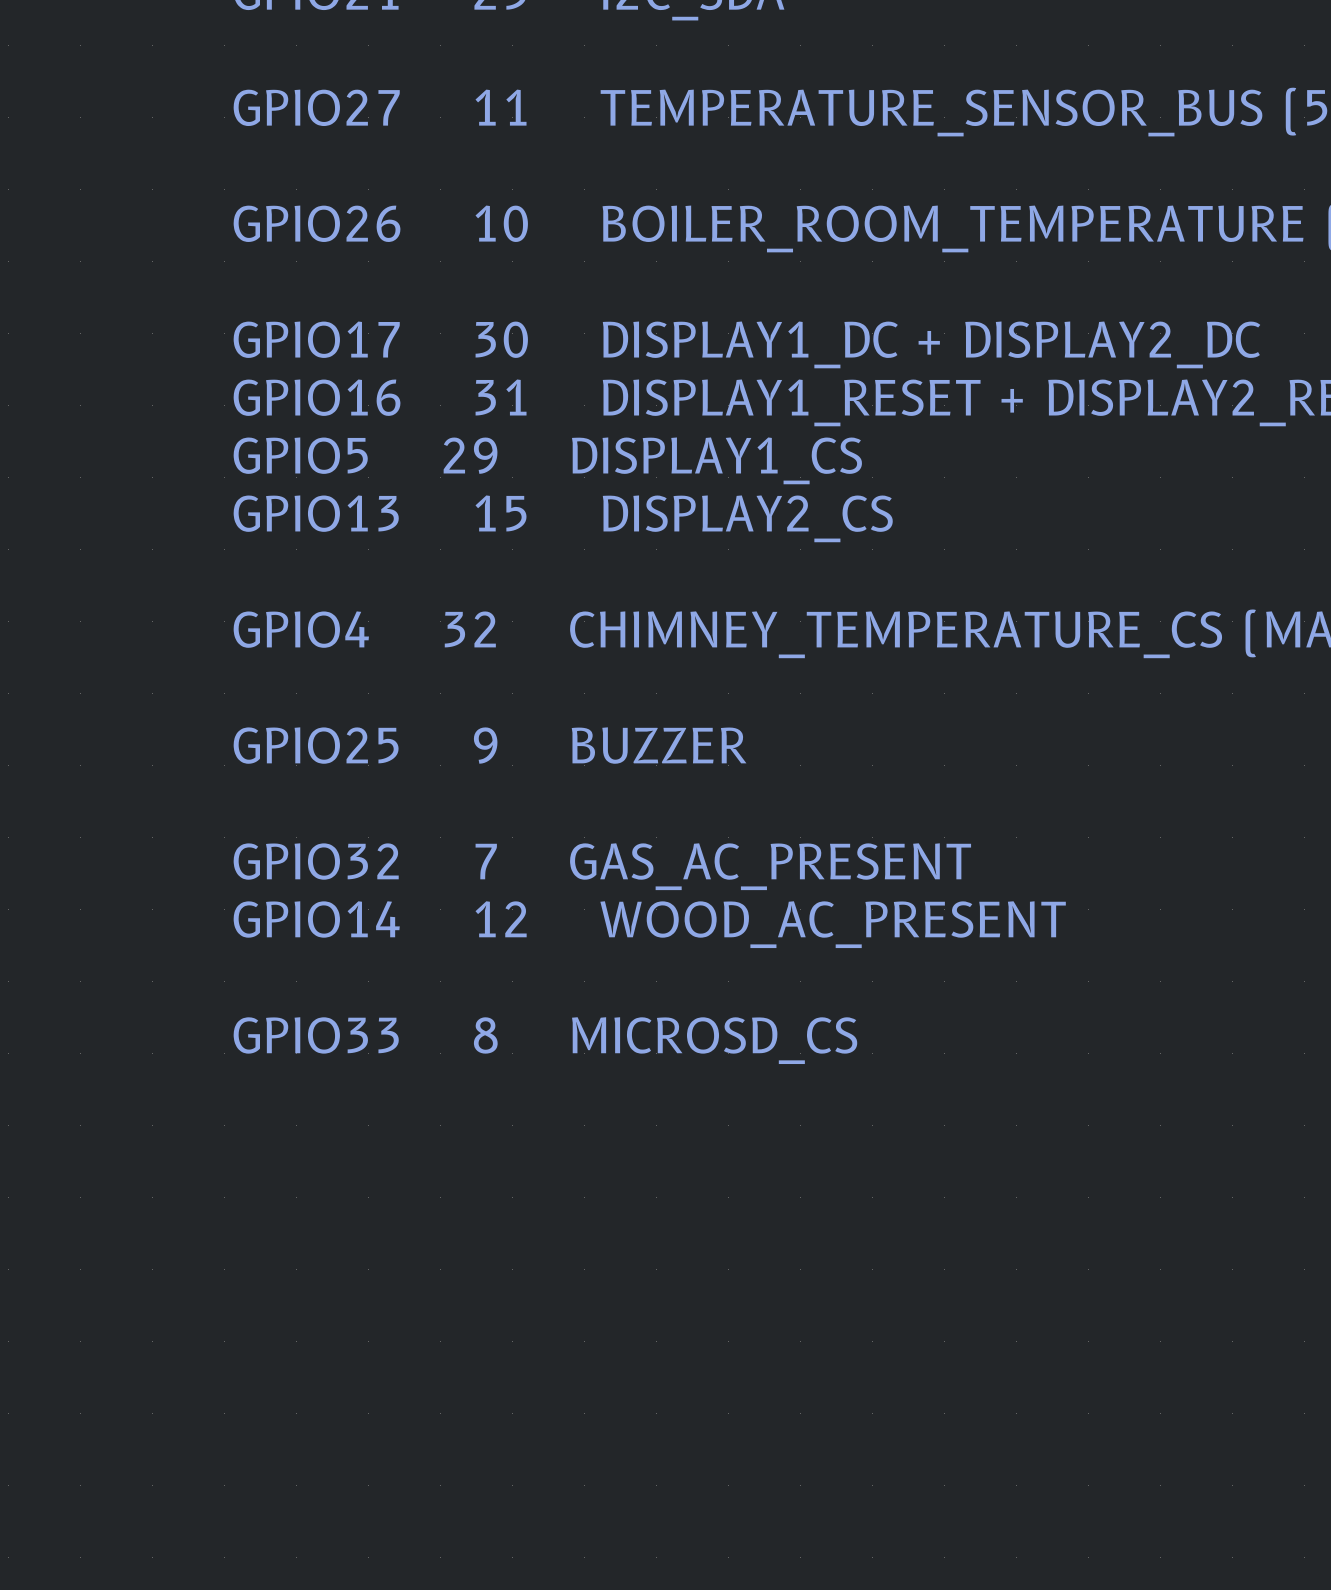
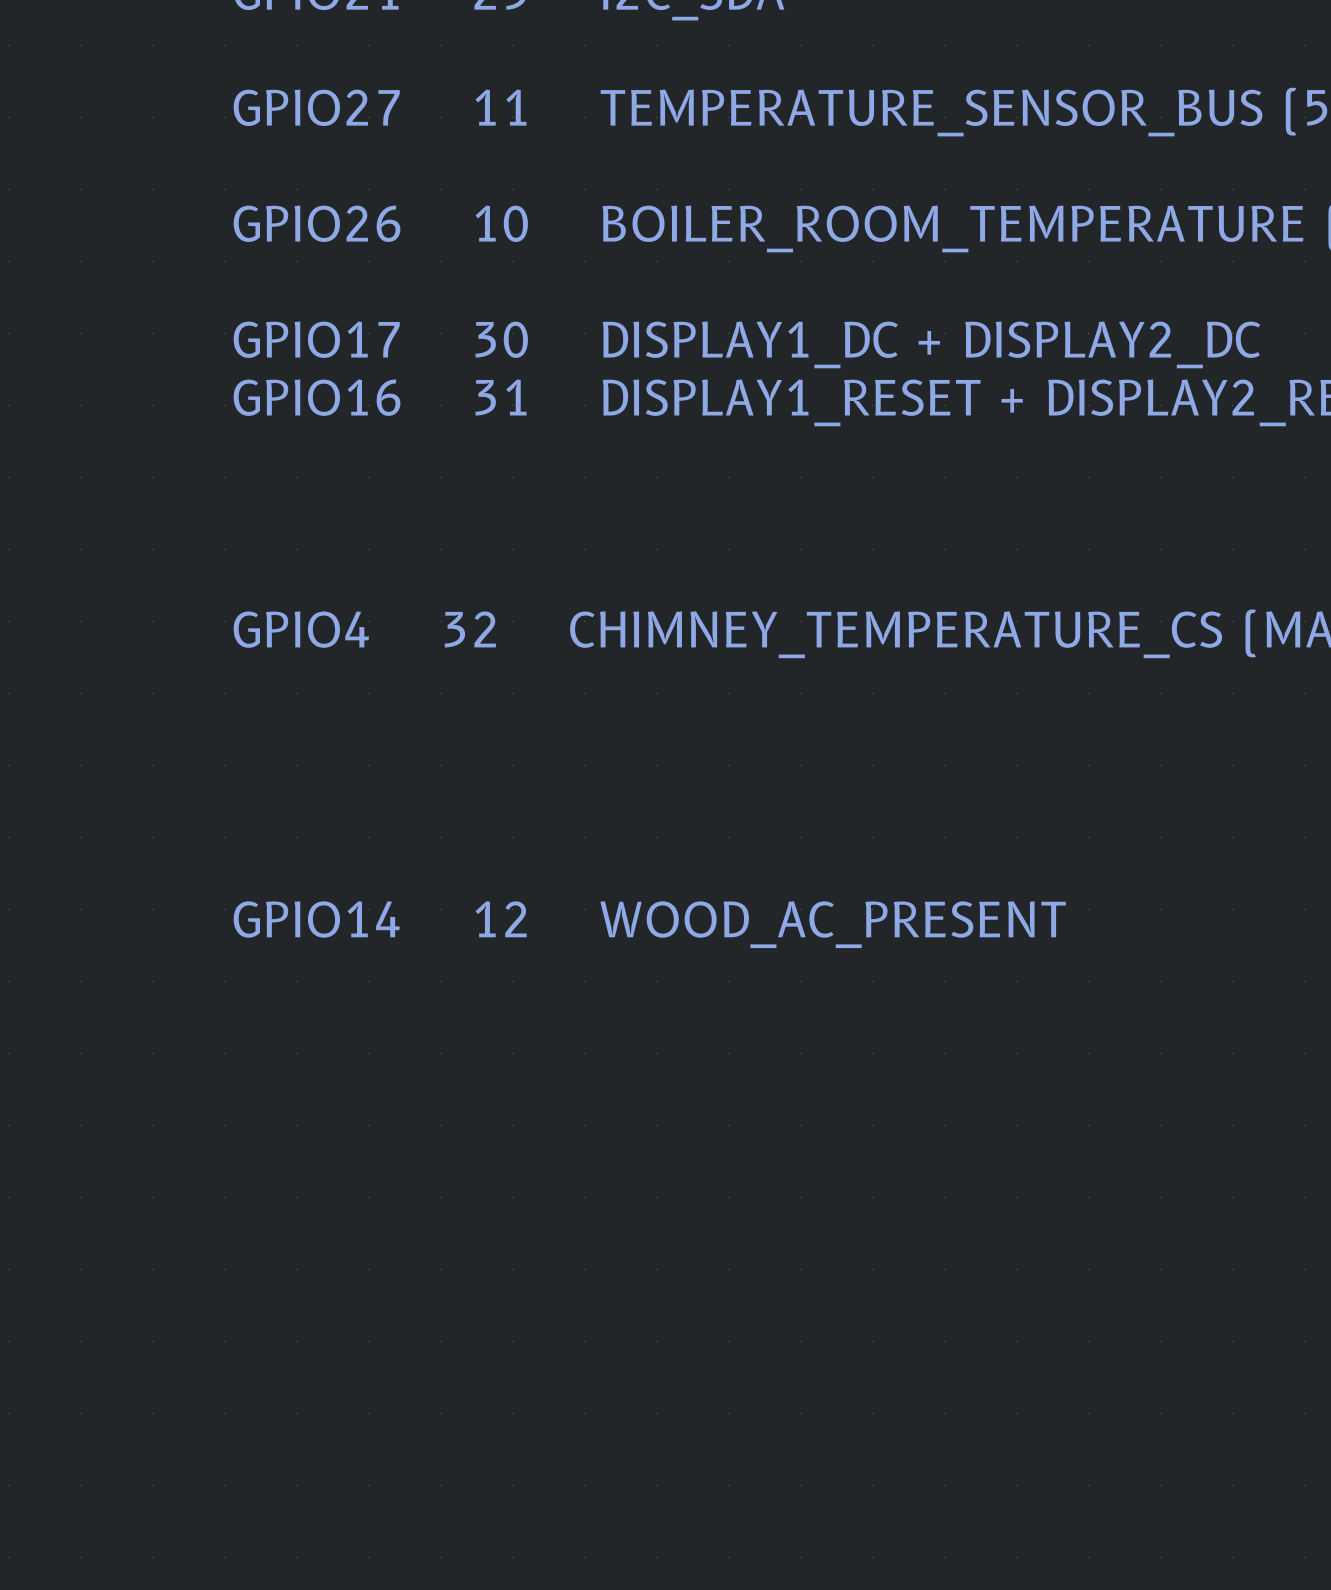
text: GPIO5 29 DISPLAY1_CS (547, 460) -> none
text: GPIO13 15 DISPLAY2_CS (563, 518) -> none
text: GPIO25 9 BUZZER (490, 745) -> none
text: GPIO32 7 GAS_AC_PRESENT (602, 866) -> none
text: GPIO33 8 MICROSD_CS (545, 1040) -> none

